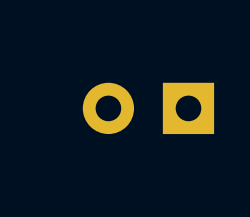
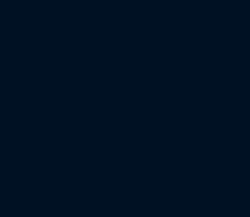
part: (148, 108) -> none

